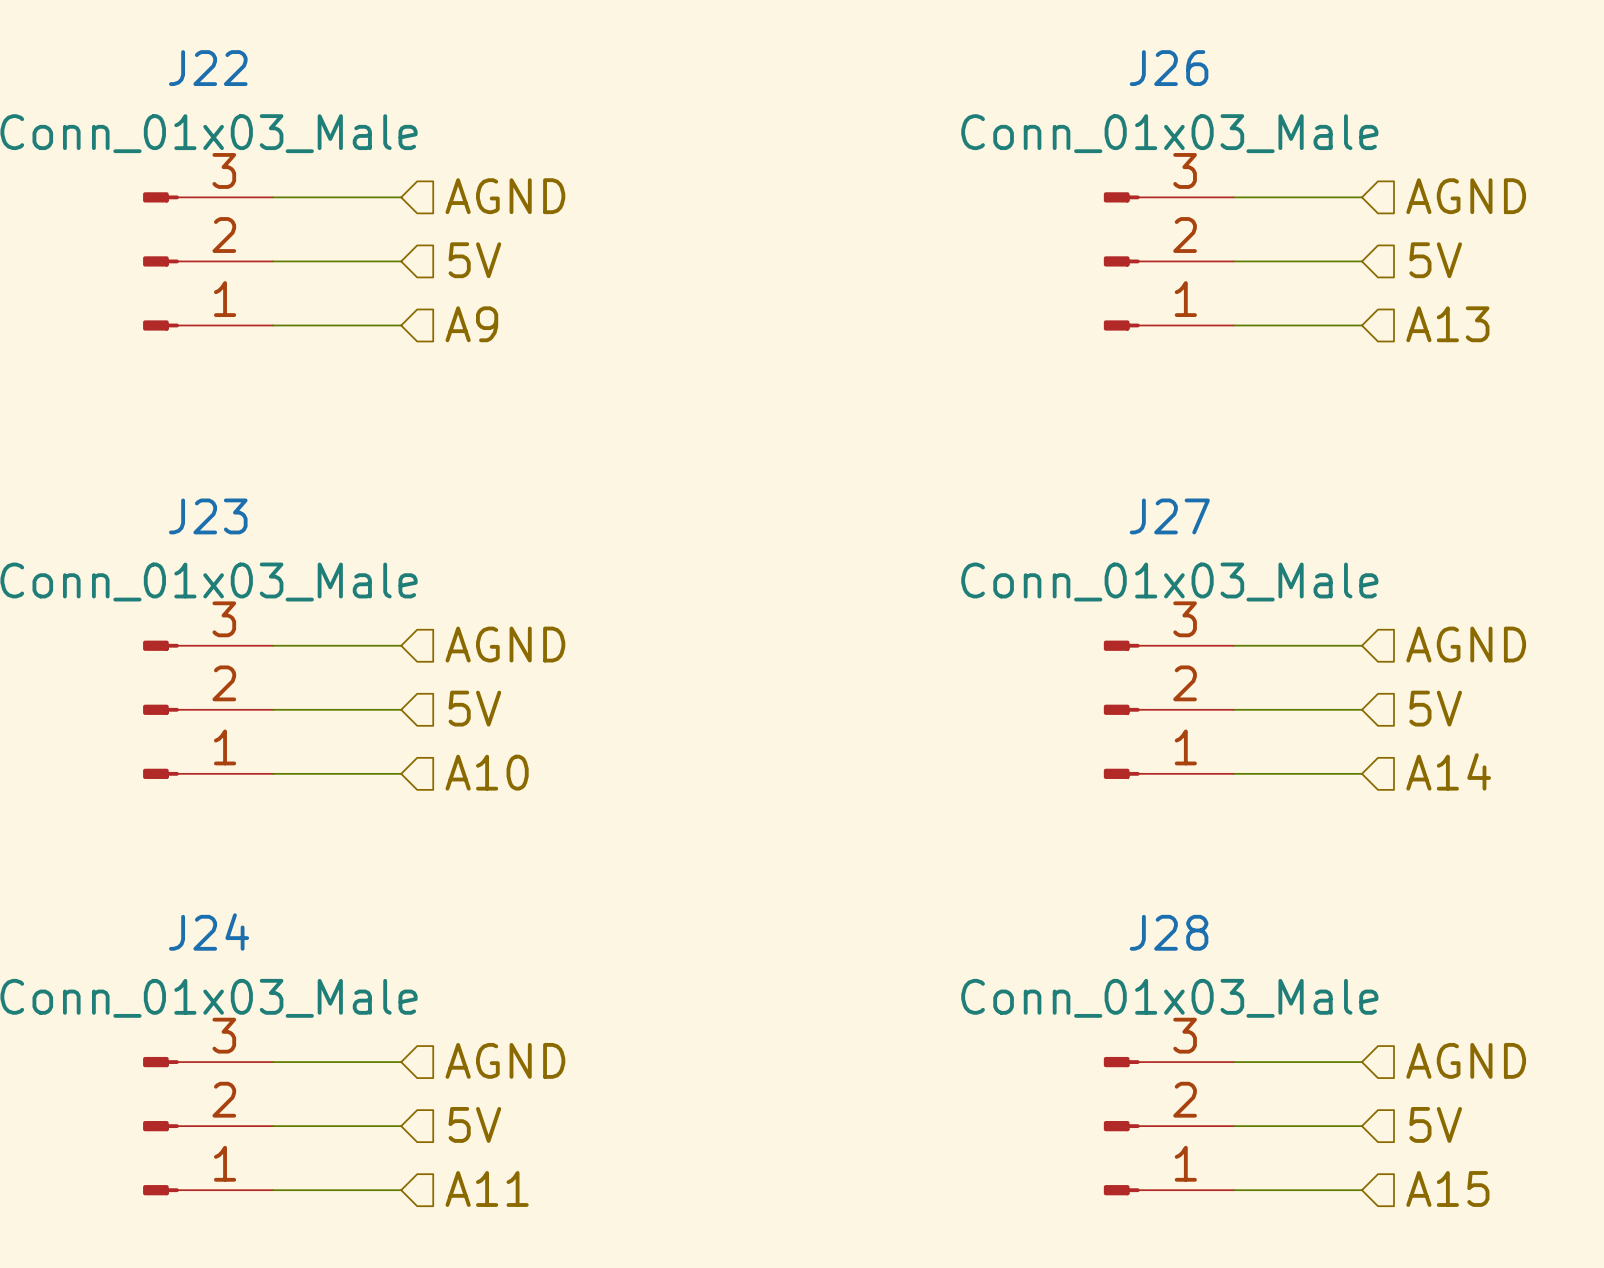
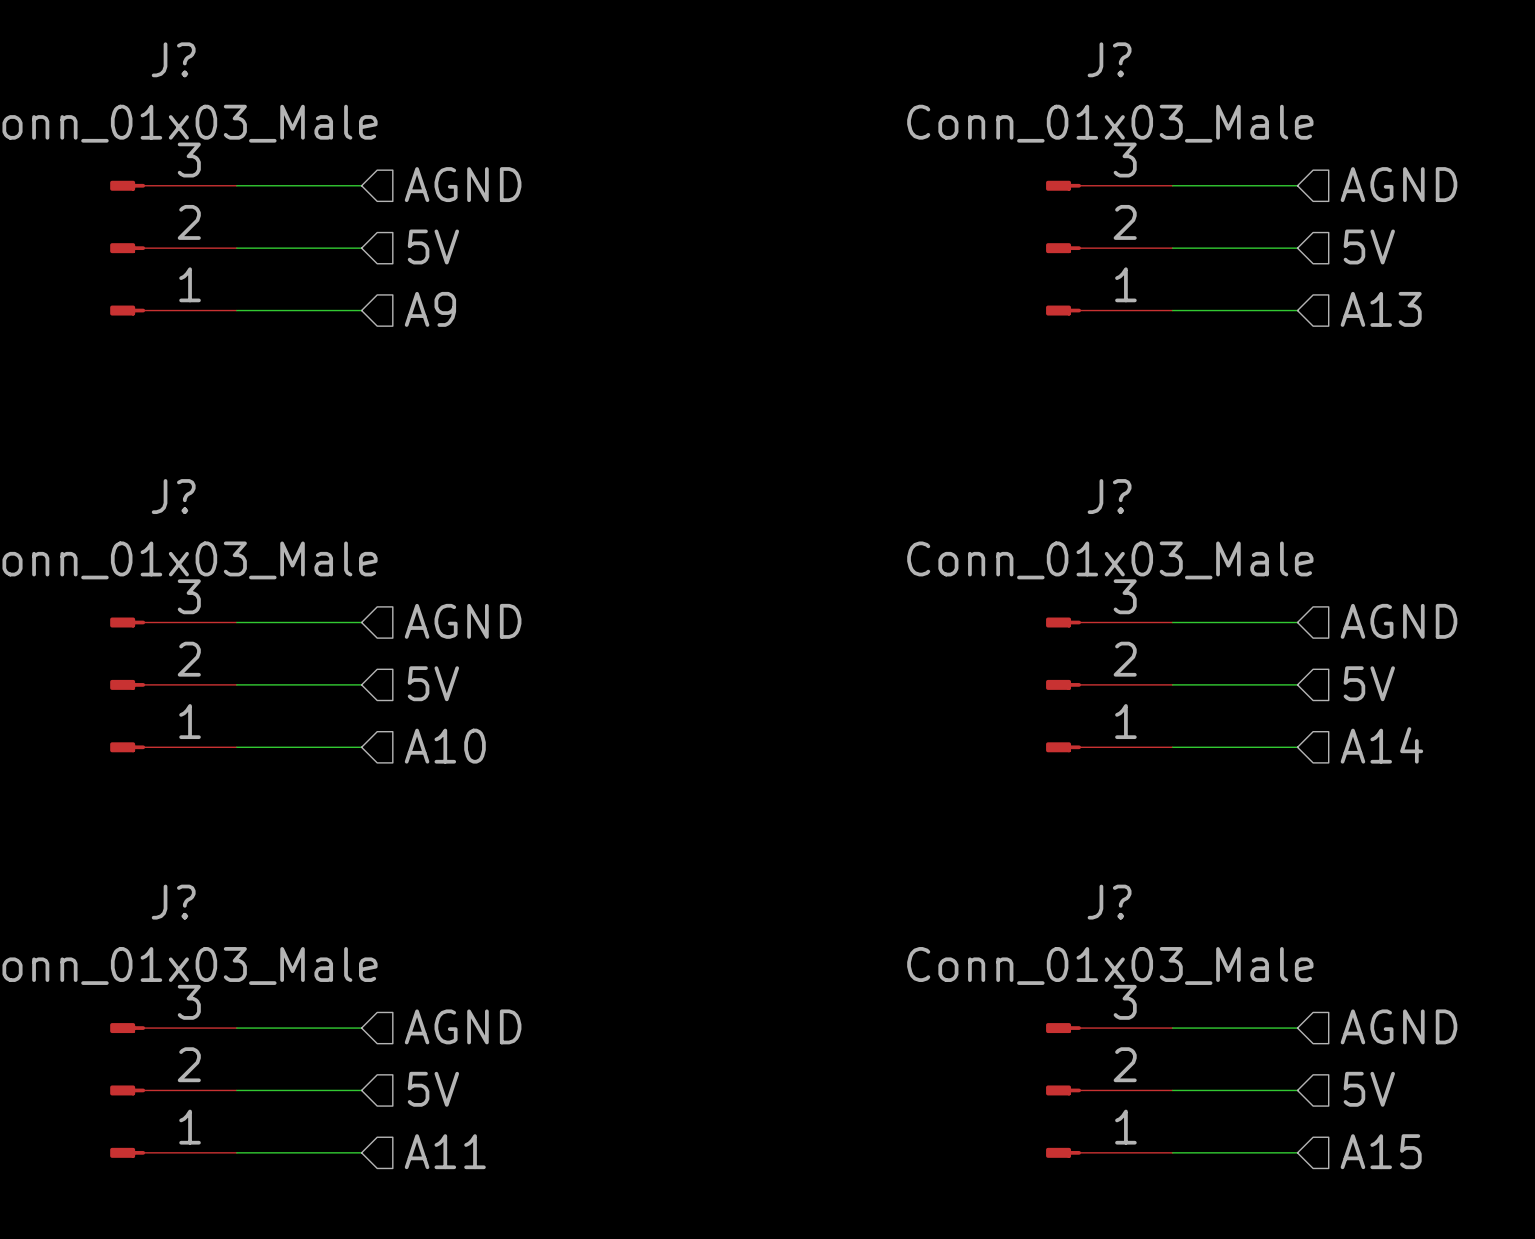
J22 name: J22 (208, 68) -> J? (173, 59)
J26 name: J26 (1169, 68) -> J? (1109, 59)
J23 name: J23 (208, 516) -> J? (173, 496)
J27 name: J27 (1169, 516) -> J? (1109, 496)
J24 name: J24 (209, 932) -> J? (173, 902)
J28 name: J28 (1169, 932) -> J? (1109, 902)

